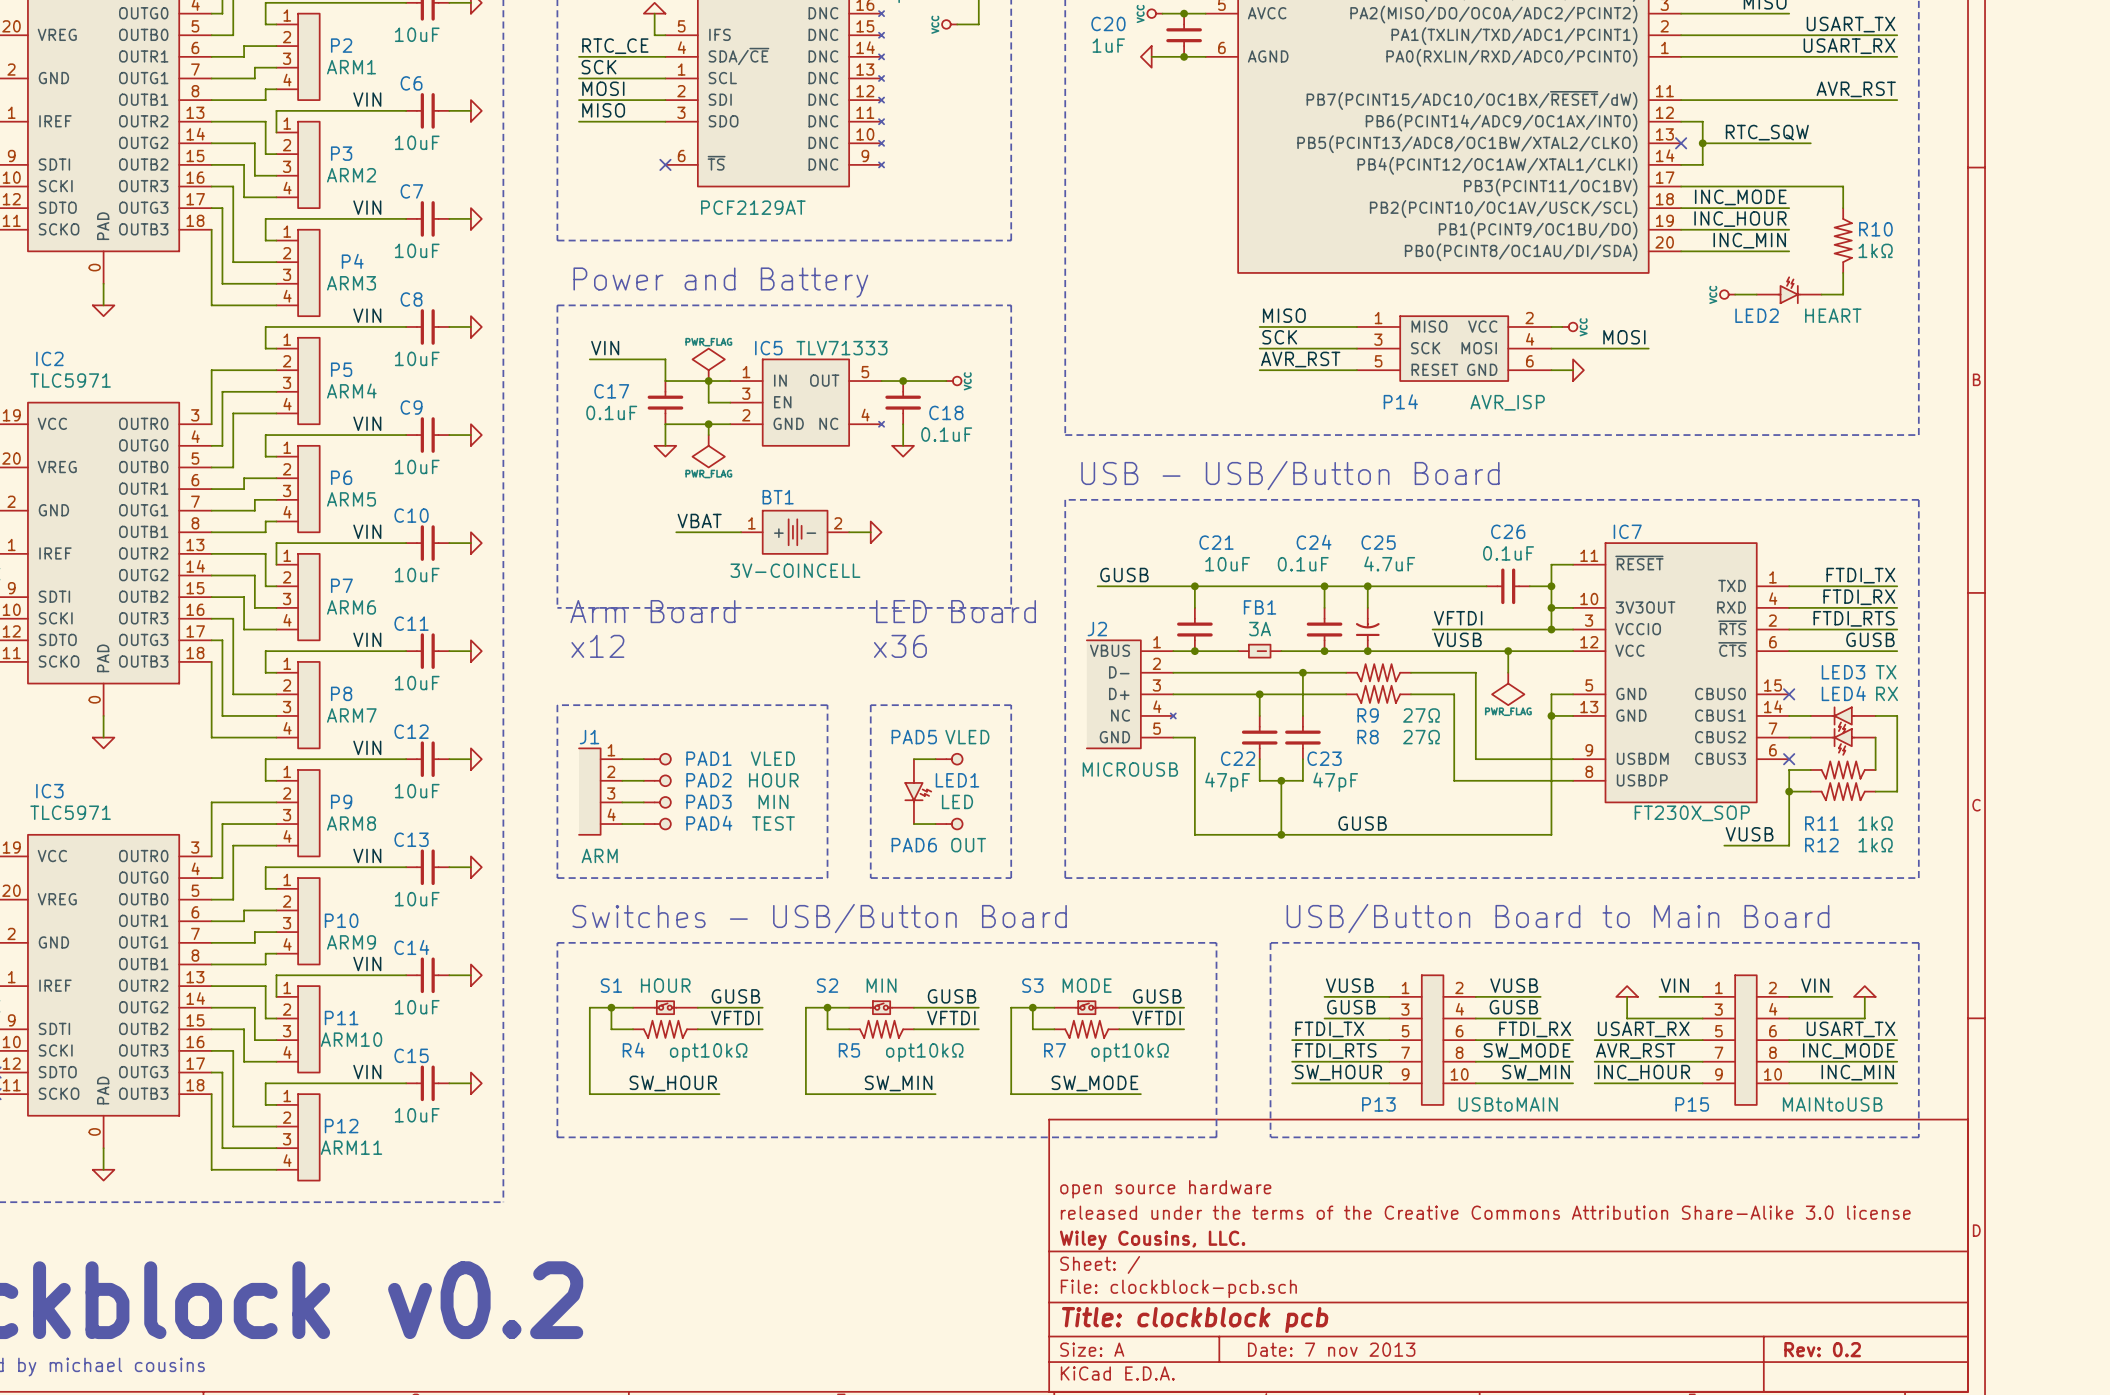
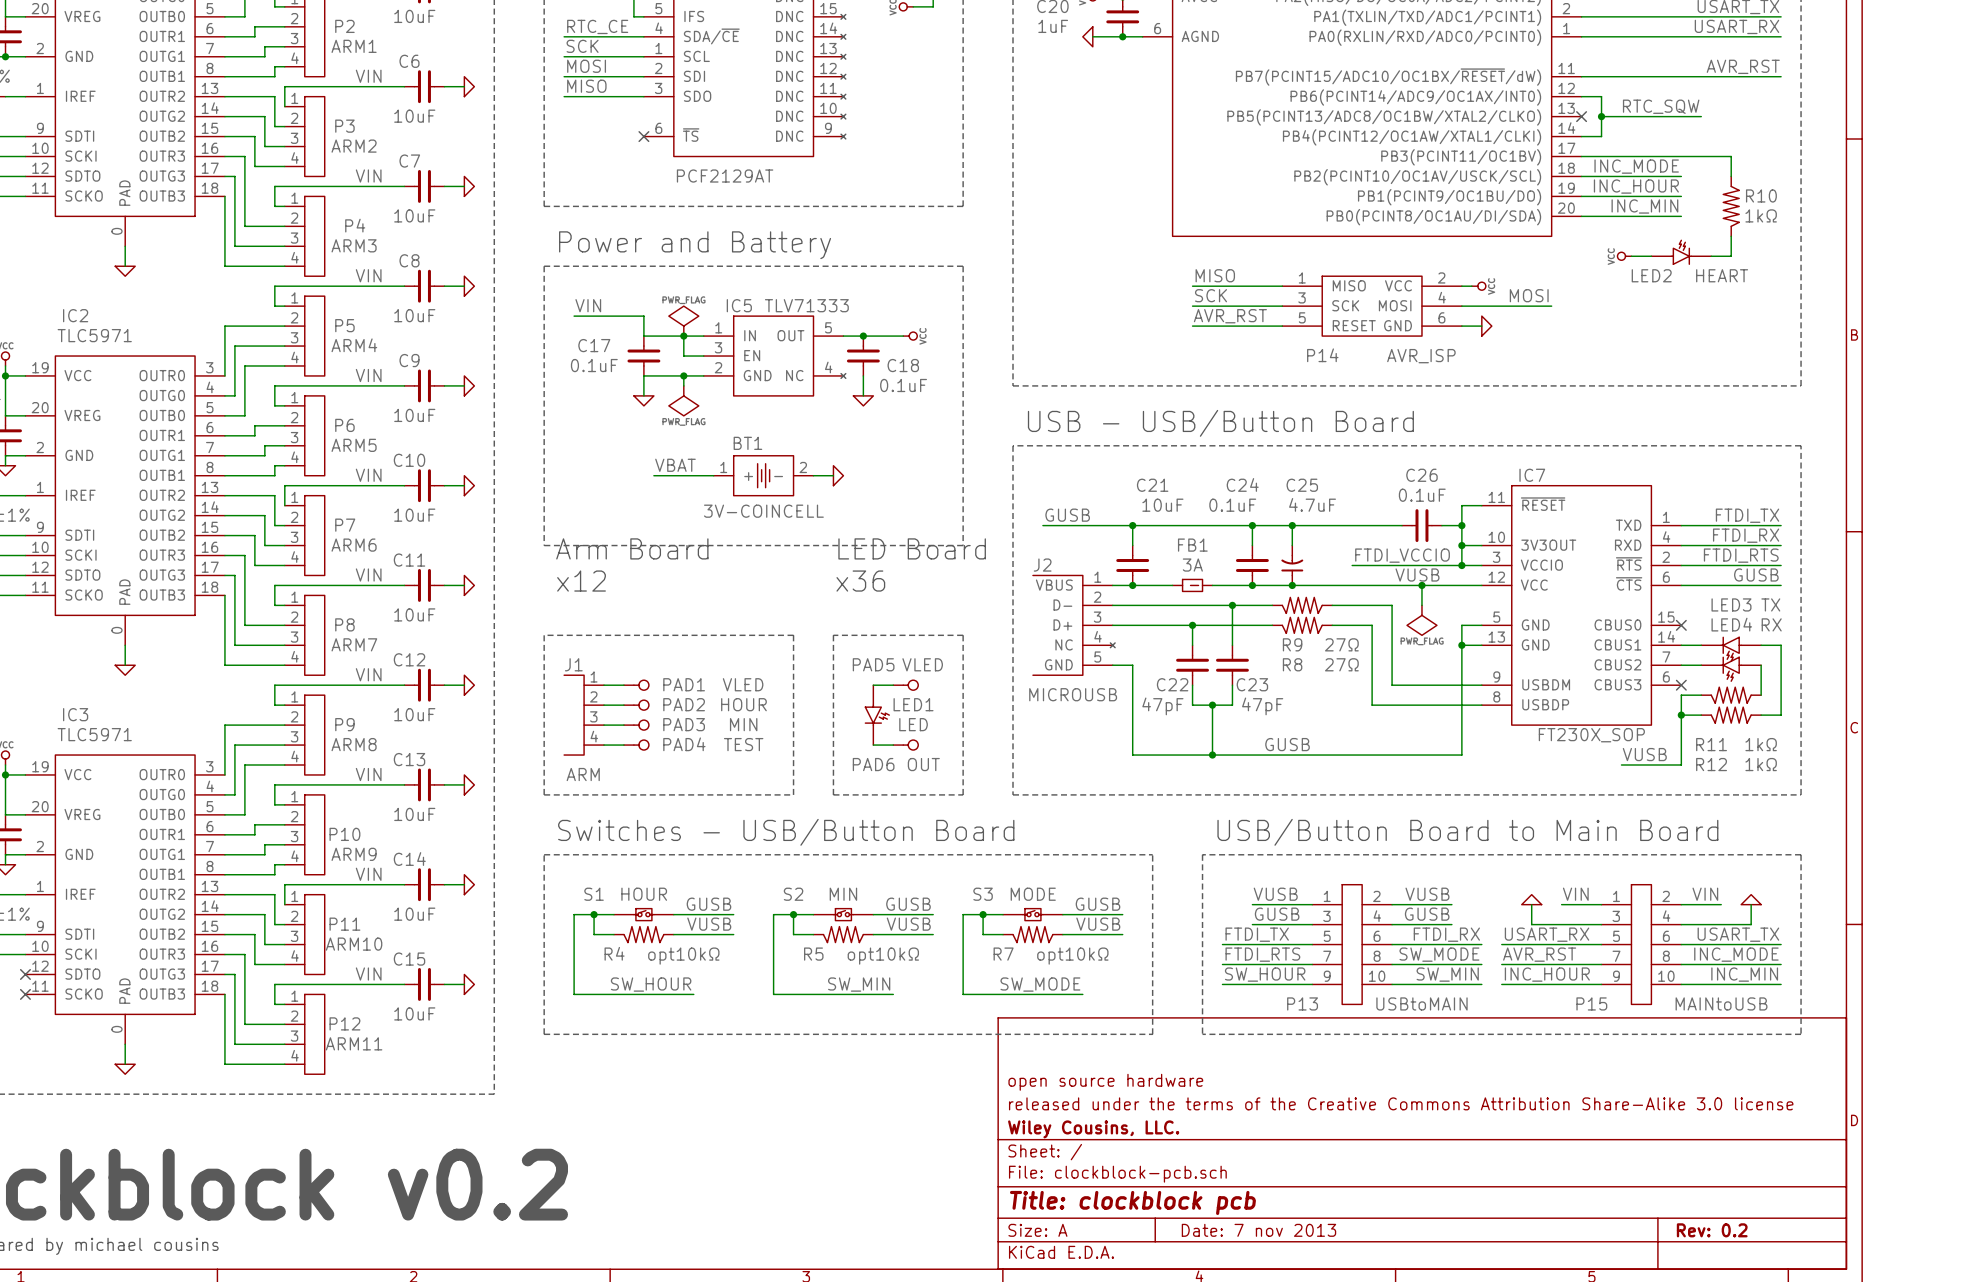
label: VFTDI (1458, 618) -> FTDI_VCCIO (1402, 555)
label position: VUSB (1457, 639) -> VUSB (1417, 575)
label: VFTDI (735, 1018) -> VUSB (709, 924)
label: VFTDI (951, 1018) -> VUSB (908, 924)
label: VFTDI (1156, 1018) -> VUSB (1098, 924)

